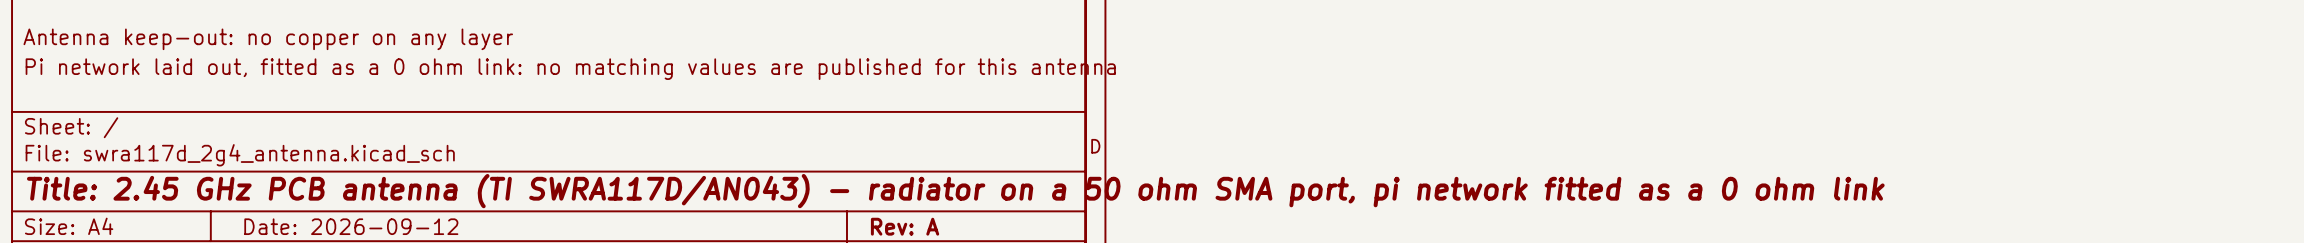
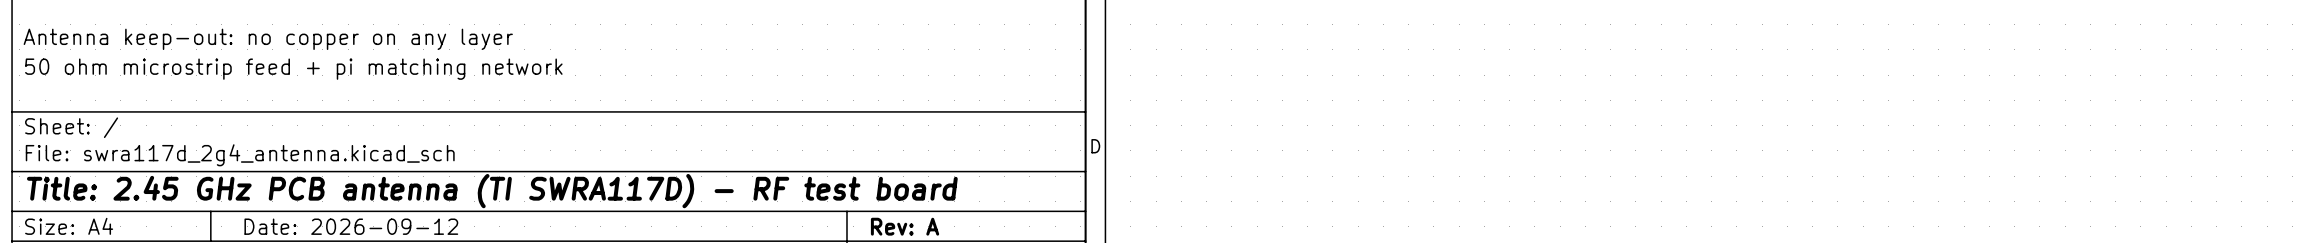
title block: Pi network laid out, fitted as a 0 ohm link: no matching values are published for this antenna (570, 69) -> 50 ohm microstrip feed + pi matching network (293, 69)
title block: Title: 2.45 GHz PCB antenna (TI SWRA117D/AN043) - radiator on a 50 ohm SMA port, pi network fitted as a 0 ohm link (955, 191) -> Title: 2.45 GHz PCB antenna (TI SWRA117D) - RF test board (492, 191)

